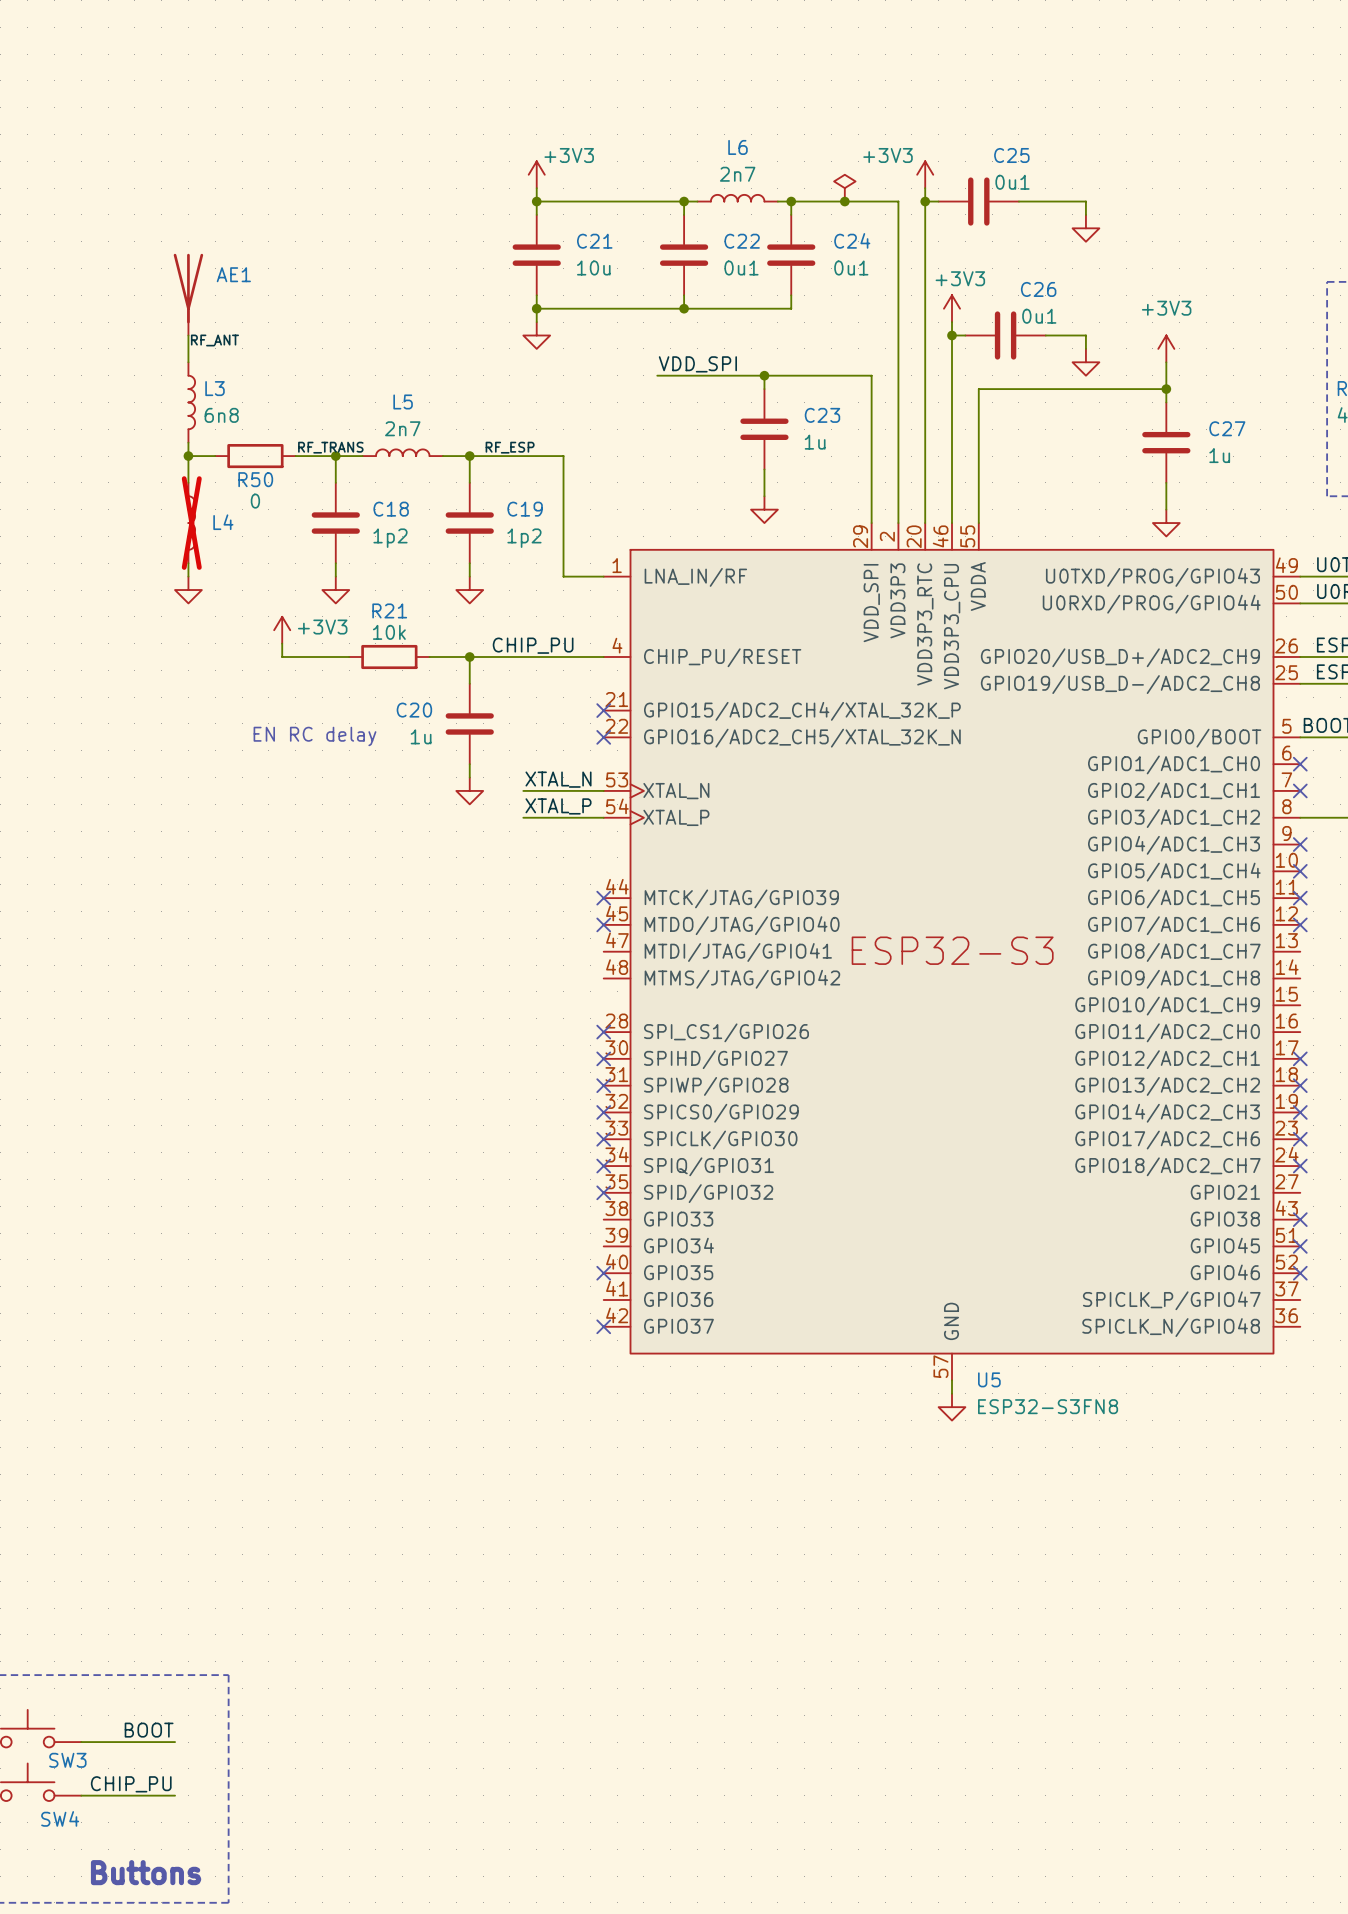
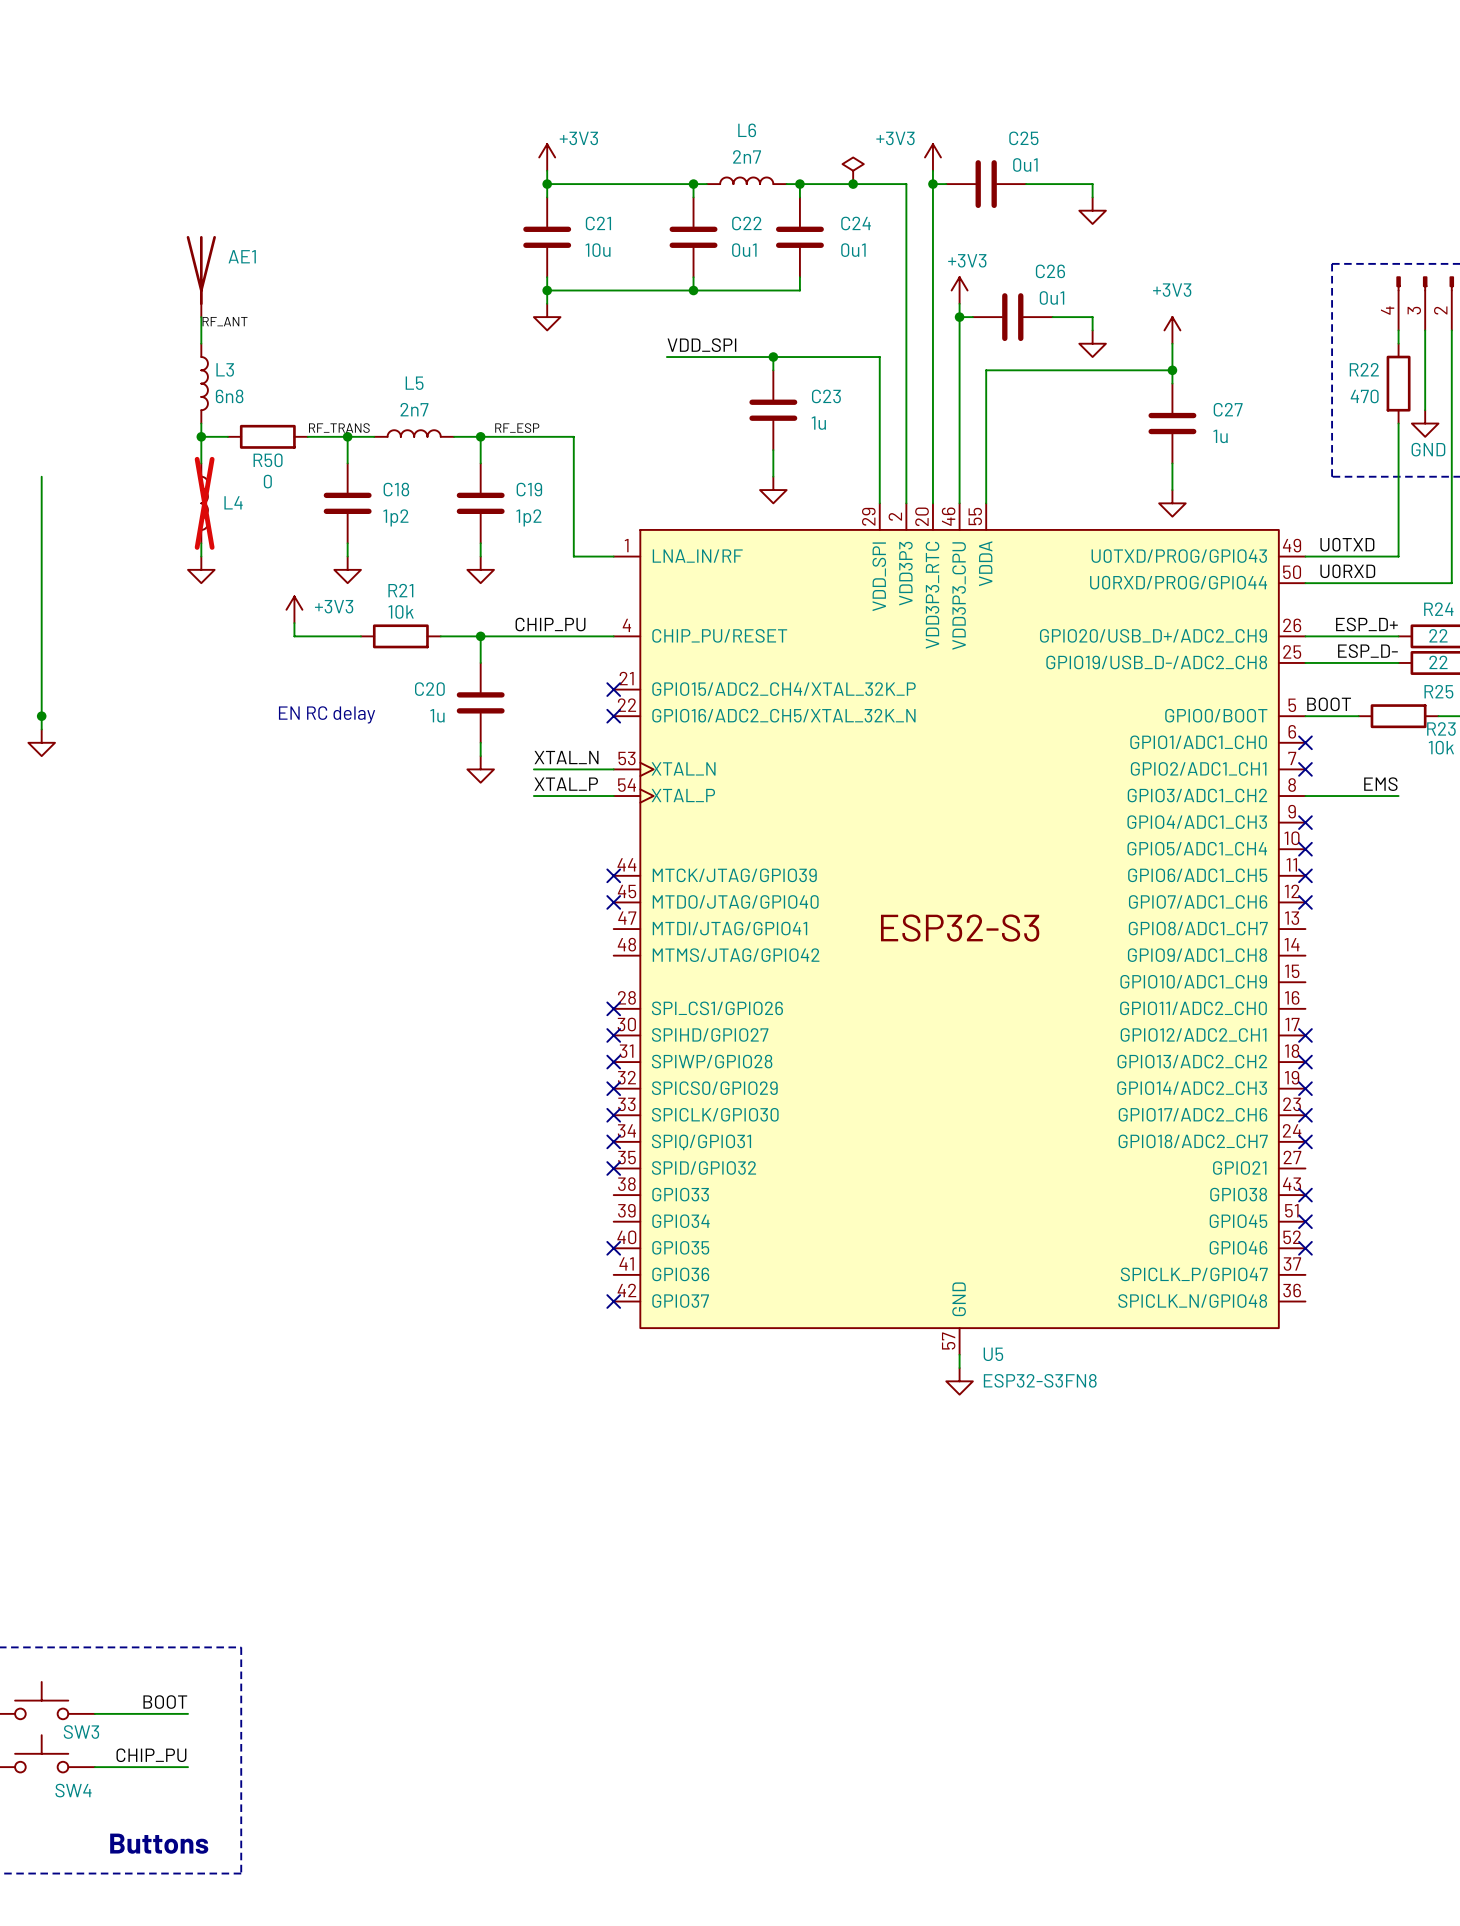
wire: none -> (41, 476) (41, 729)
junction: none -> (41, 716)
power symbol: none -> (41, 742)

